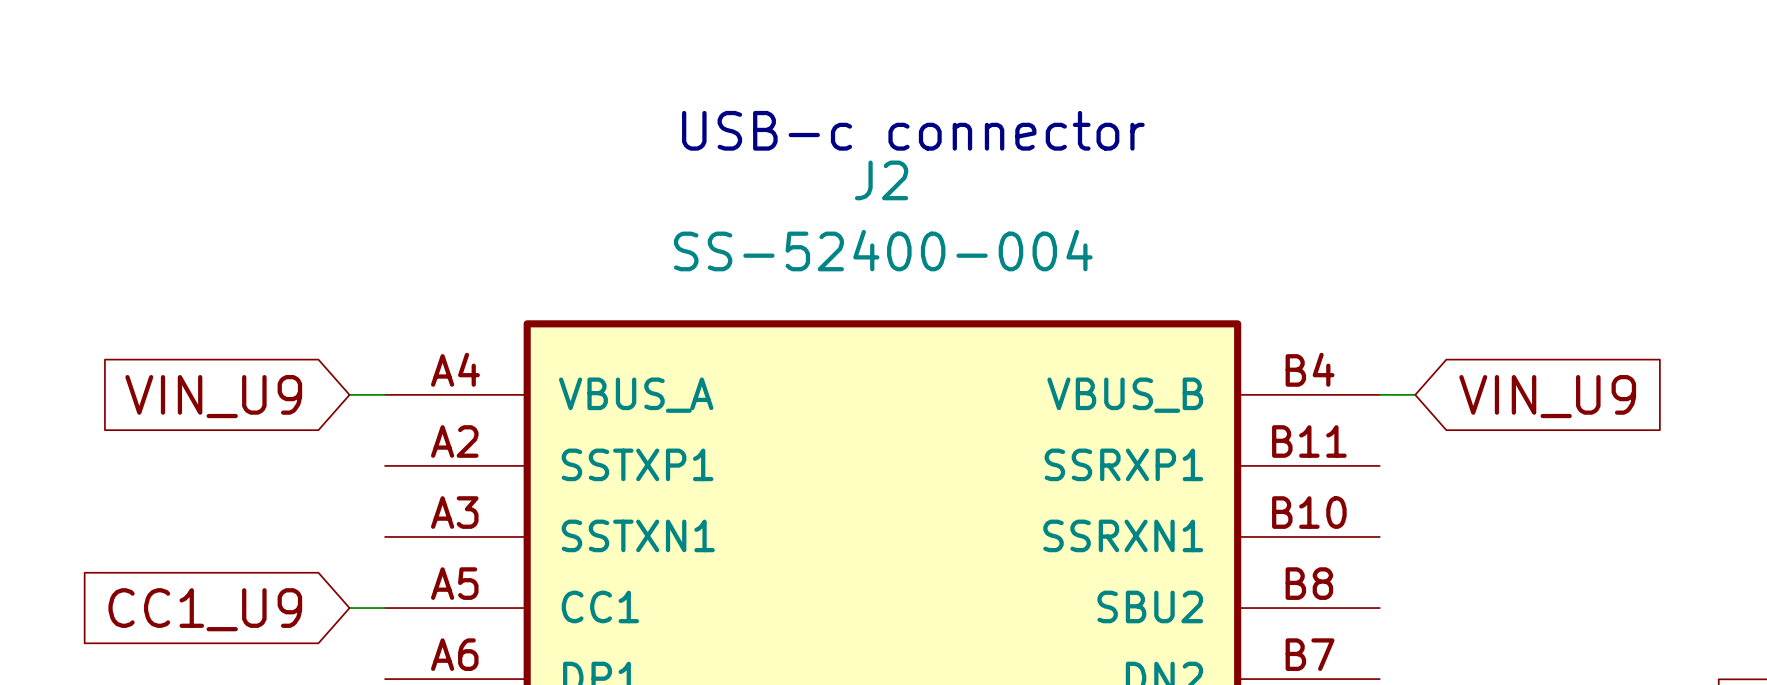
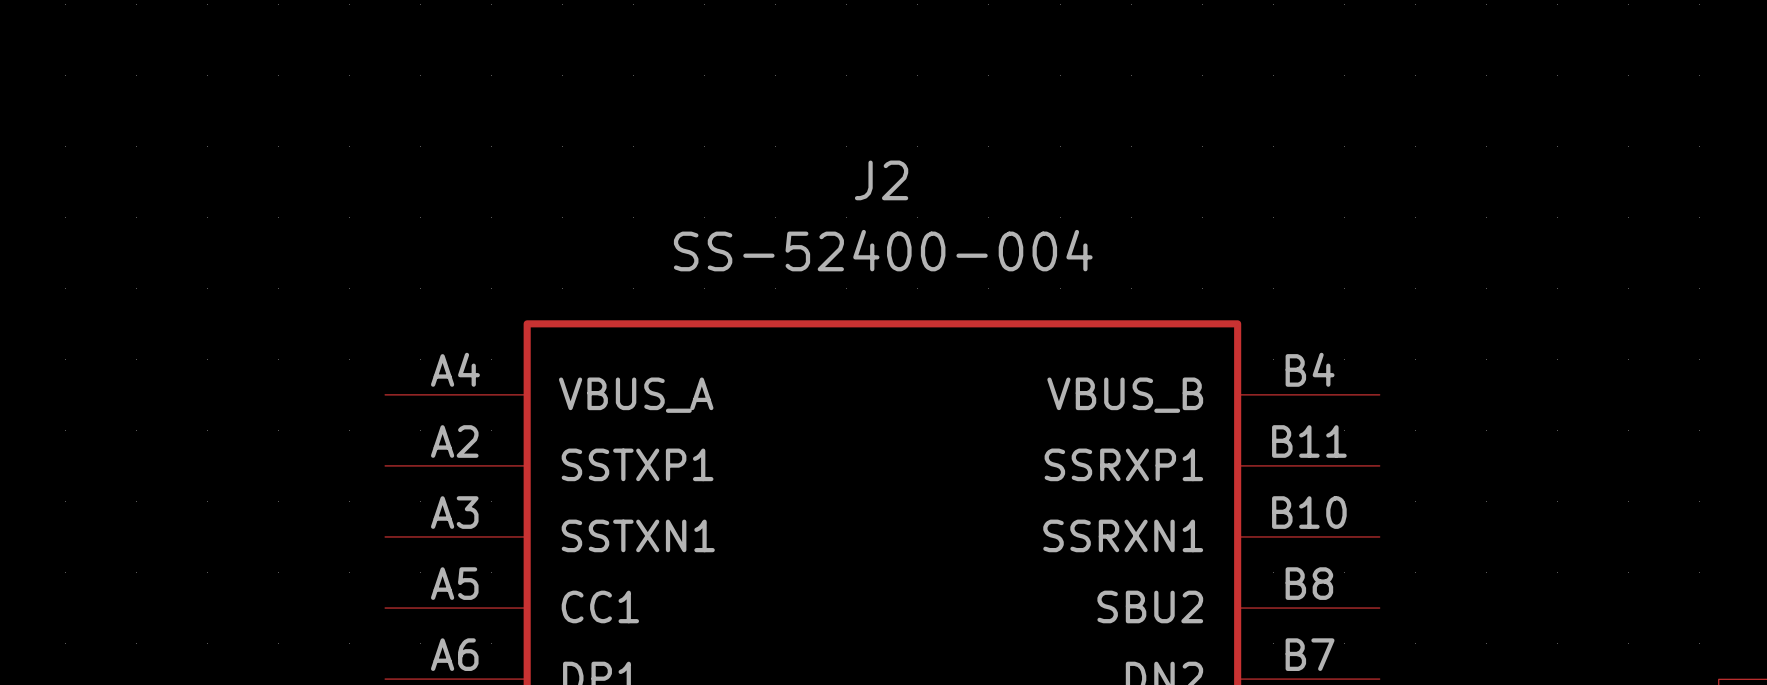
text: USB-c connector (913, 130) -> none
wire: (349, 394) (385, 394) -> none
wire: (1379, 394) (1415, 394) -> none
global label: VIN_U9 (213, 396) -> none
global label: VIN_U9 (1547, 396) -> none
wire: (349, 608) (385, 608) -> none
global label: CC1_U9 (205, 609) -> none

